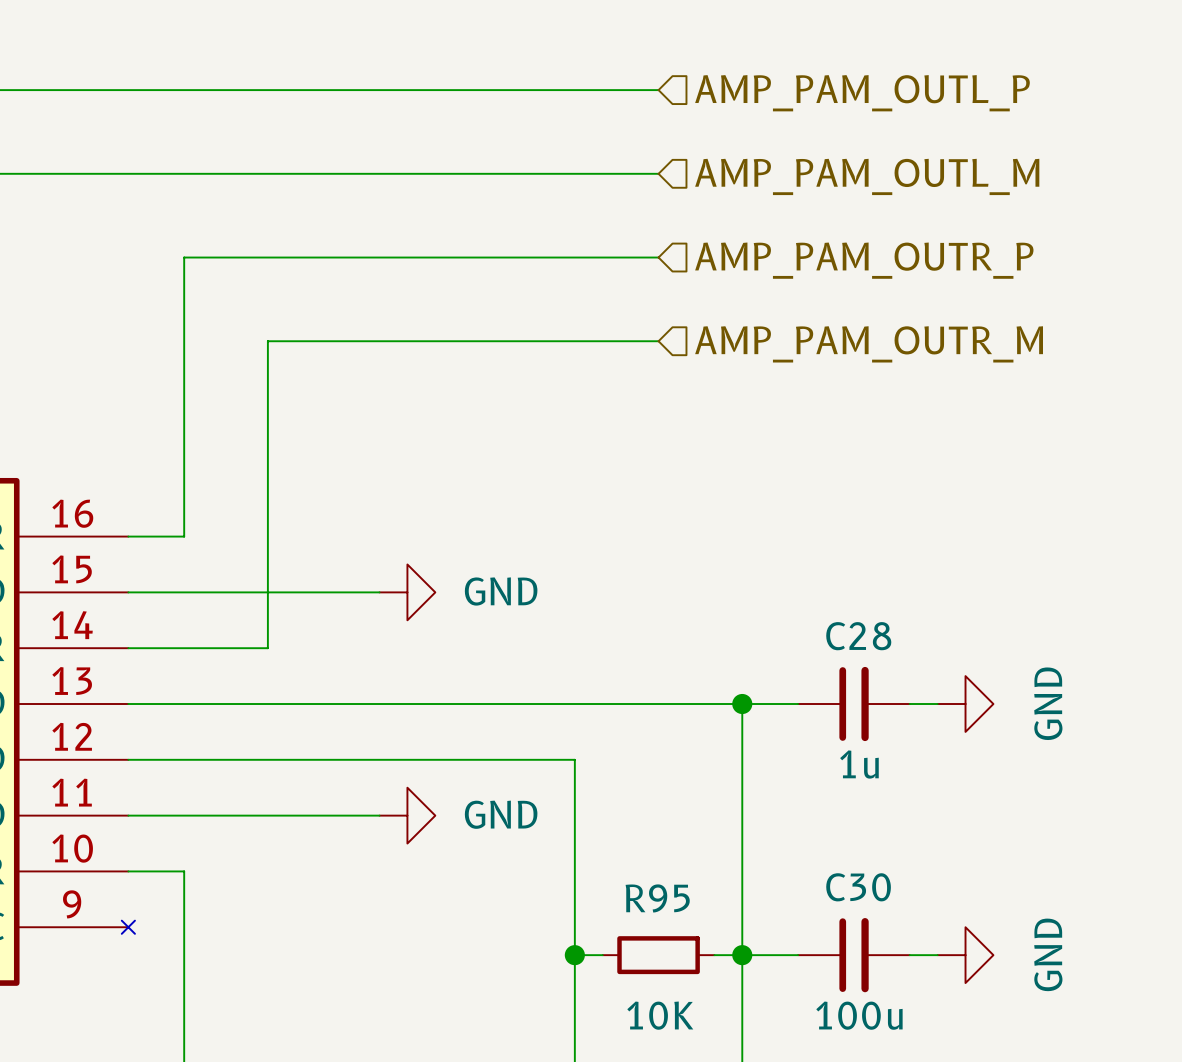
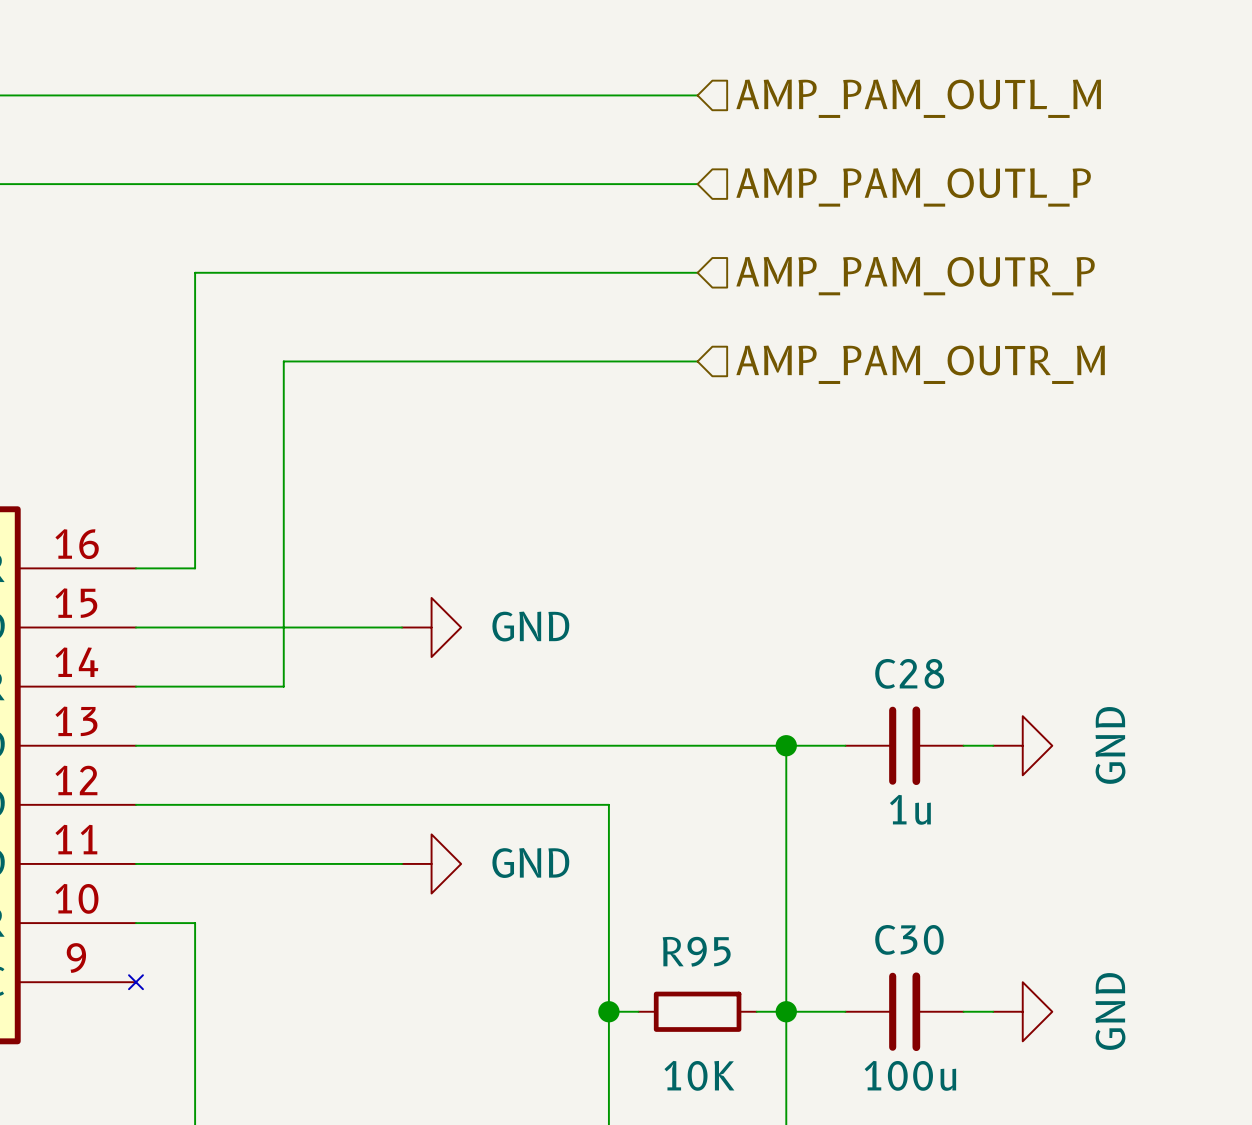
hierarchical label: AMP_PAM_OUTL_P (862, 93) -> AMP_PAM_OUTL_M (918, 98)
hierarchical label: AMP_PAM_OUTL_M (867, 176) -> AMP_PAM_OUTL_P (913, 187)

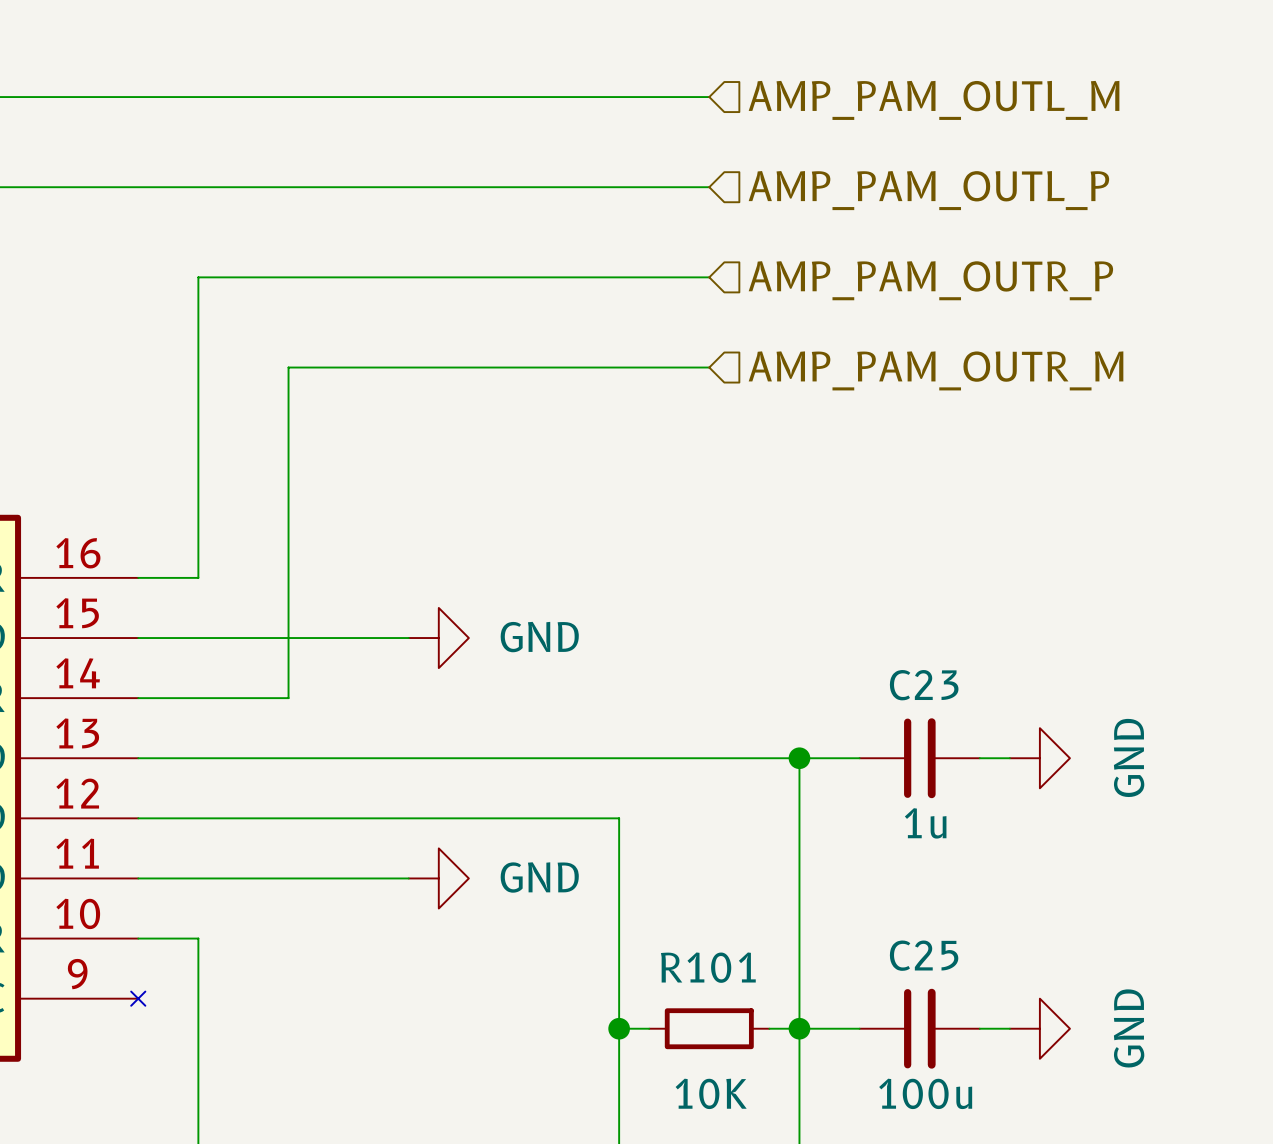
C28 name: C28 (909, 673) -> C23 (924, 685)
C30 name: C30 (909, 939) -> C25 (924, 955)
R95 name: R95 (696, 951) -> R101 (708, 967)

